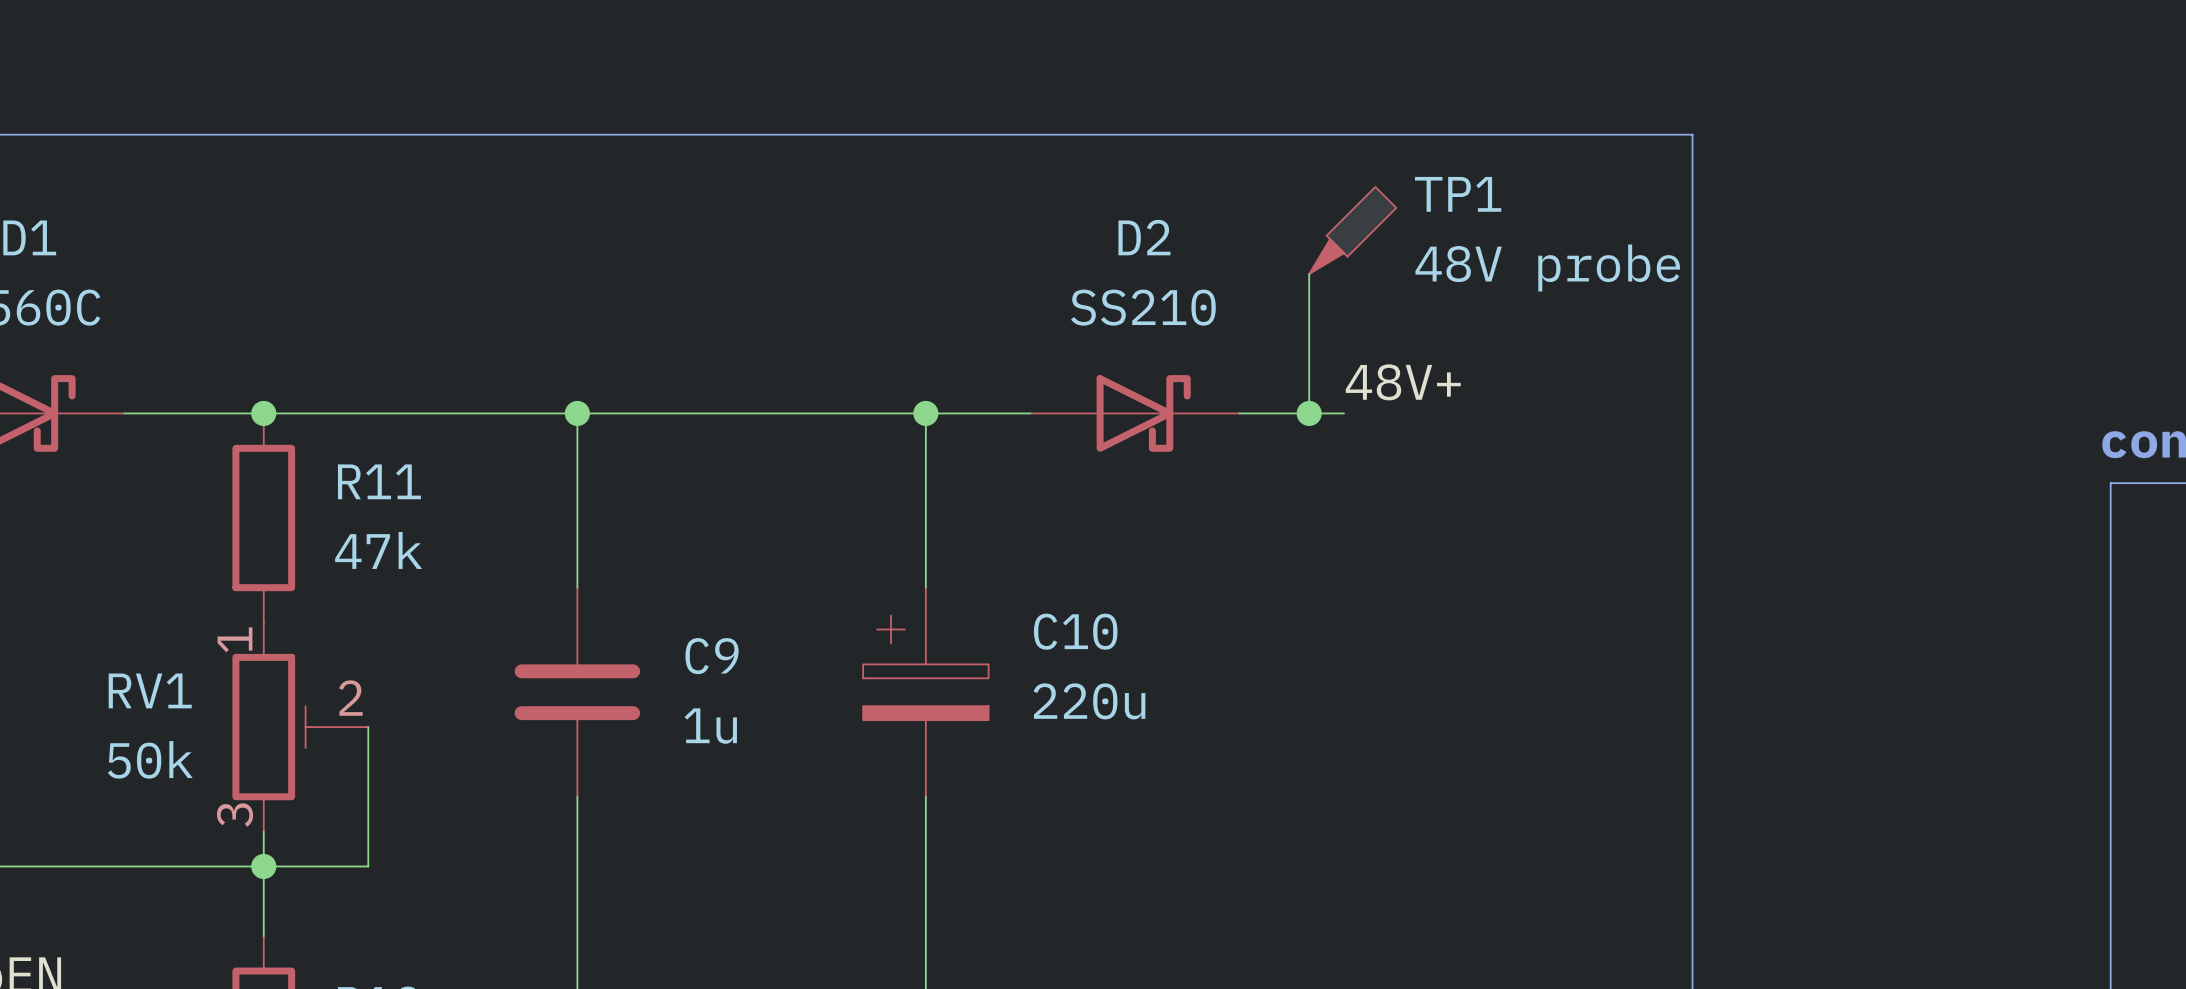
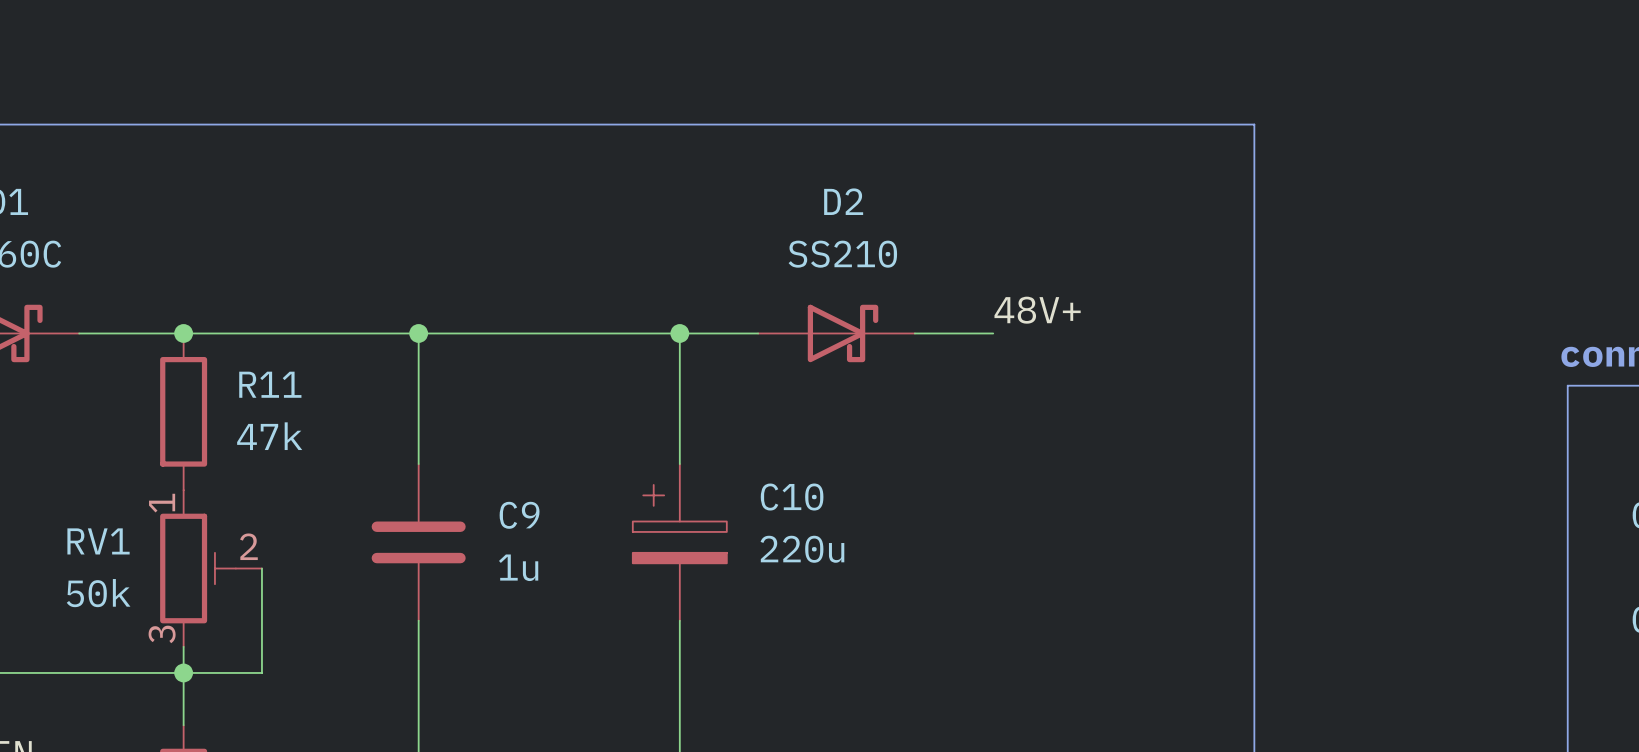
TP1: 48V probe (1352, 230) -> none
wire: (1309, 274) (1309, 413) -> none
junction: (1309, 413) -> none

